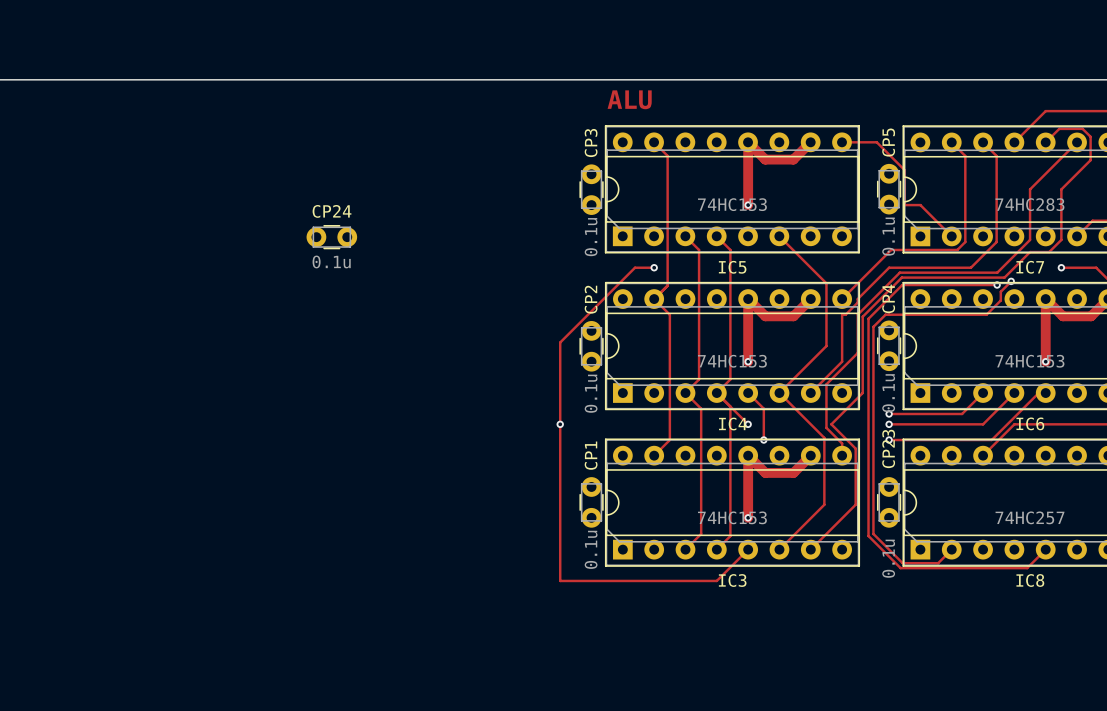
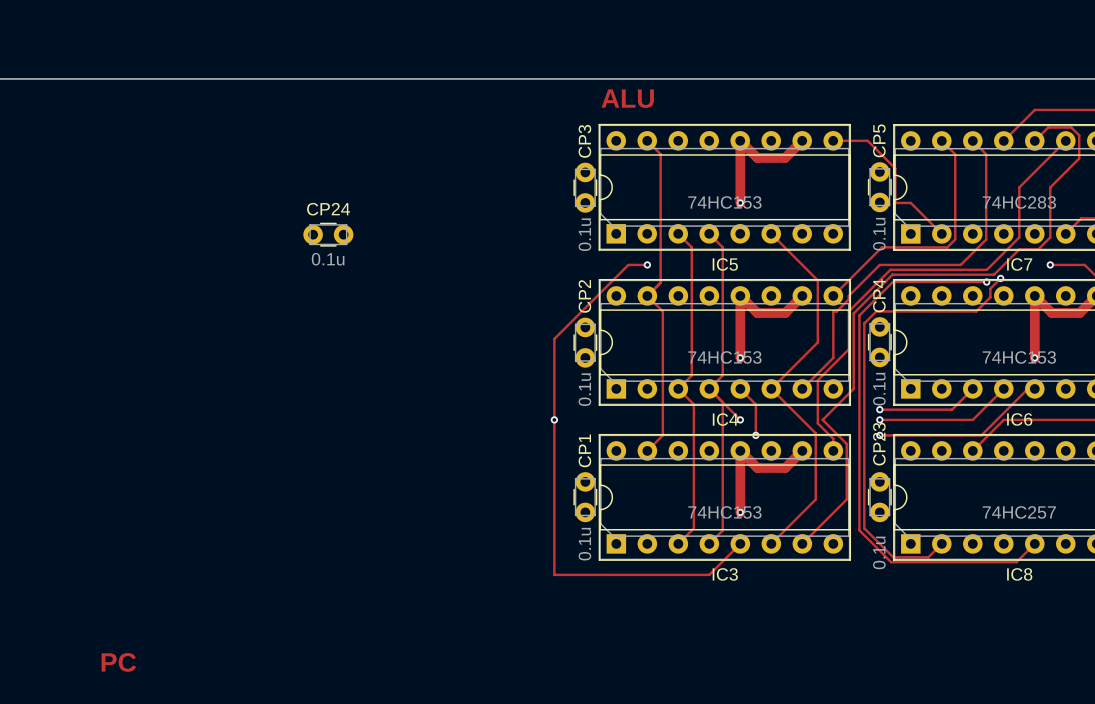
text: none -> PC (118, 662)

